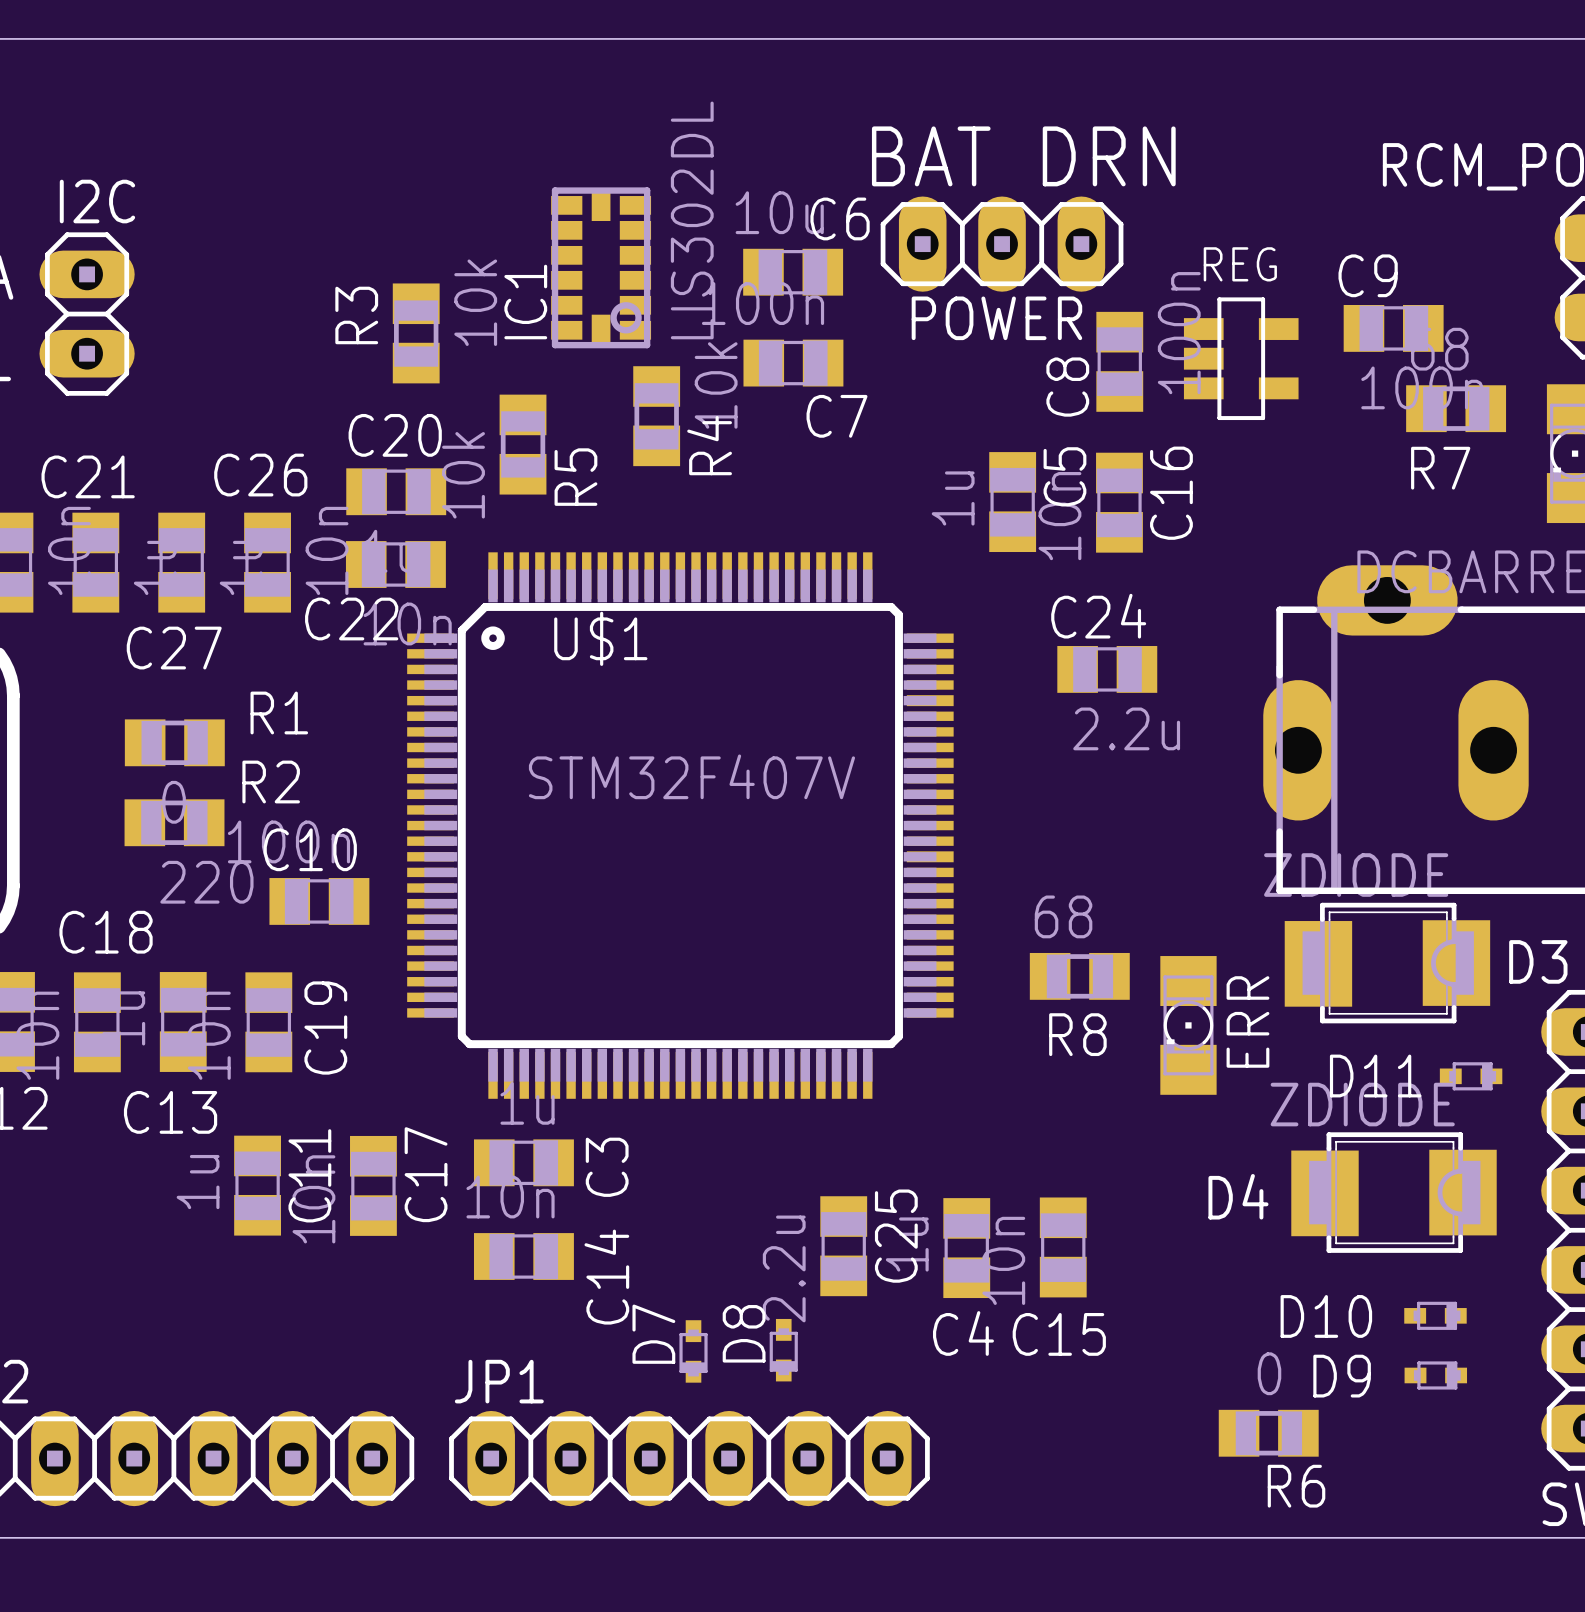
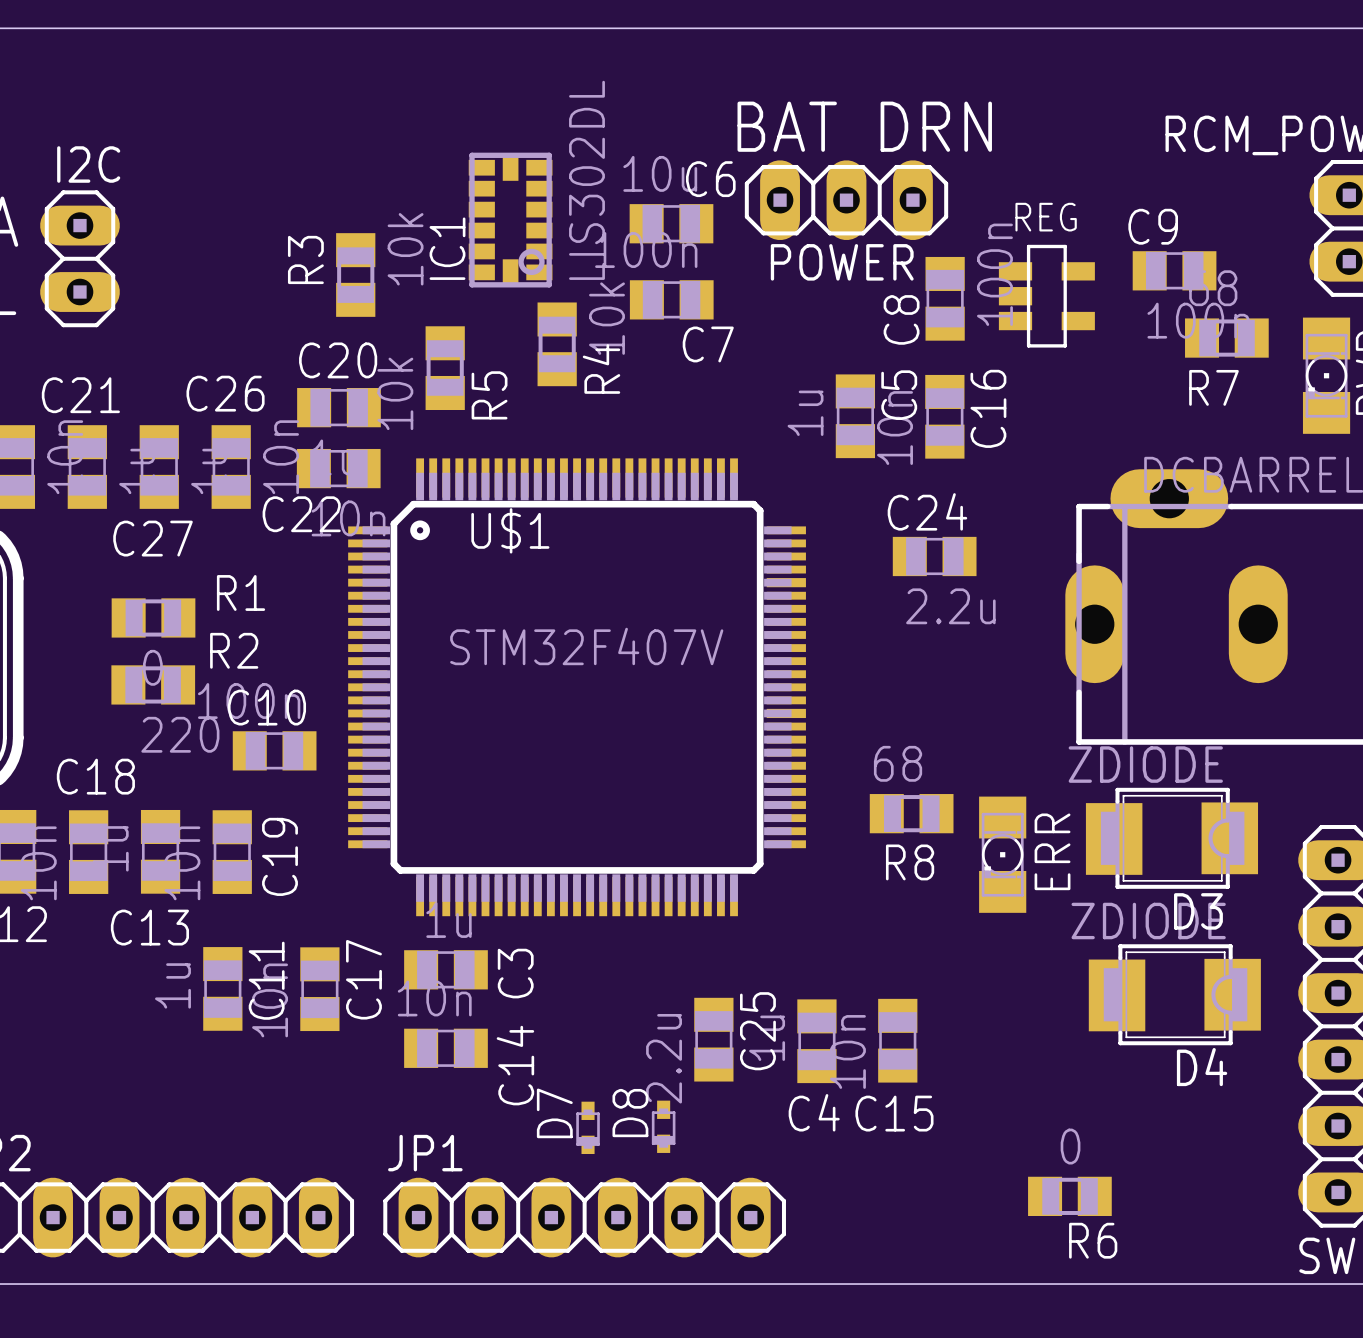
D3 name position: D3 (1538, 961) -> D3 (1198, 911)
D3 position: (1387, 963) -> (1171, 838)
D11: (1471, 1076) -> none
D4 name position: D4 (1238, 1196) -> D4 (1202, 1067)
D10: (1435, 1315) -> none
D9: (1435, 1375) -> none

